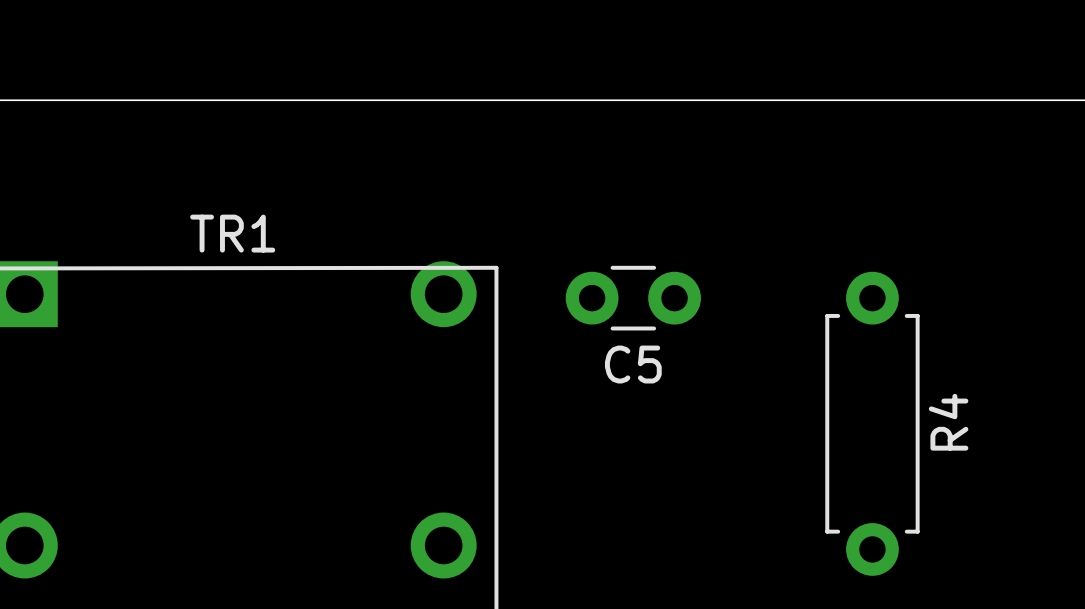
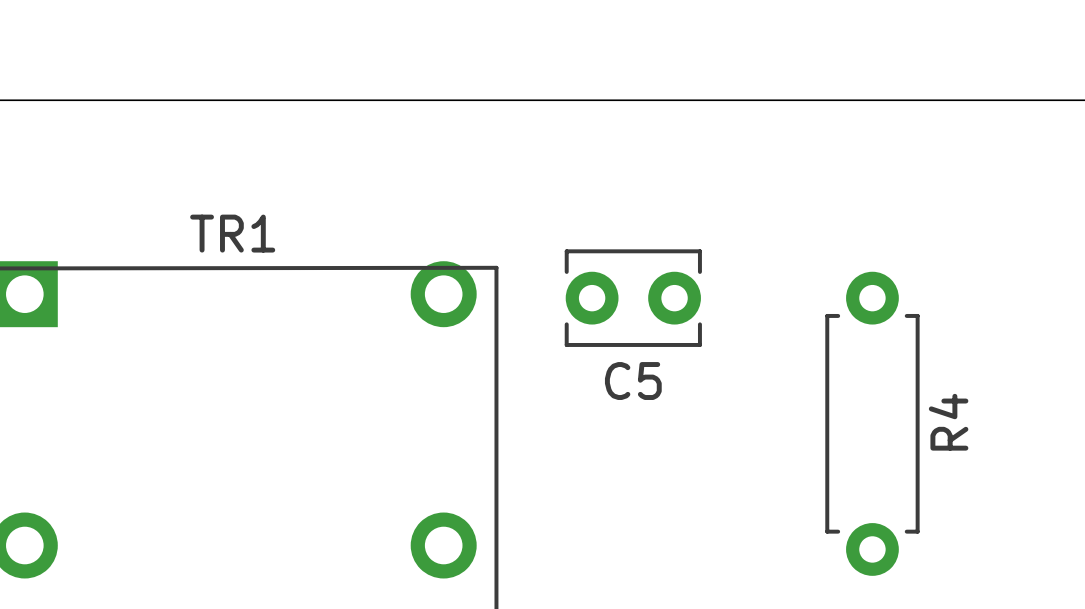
C5 footprint: [565, 265, 701, 331] -> [564, 249, 702, 347]

